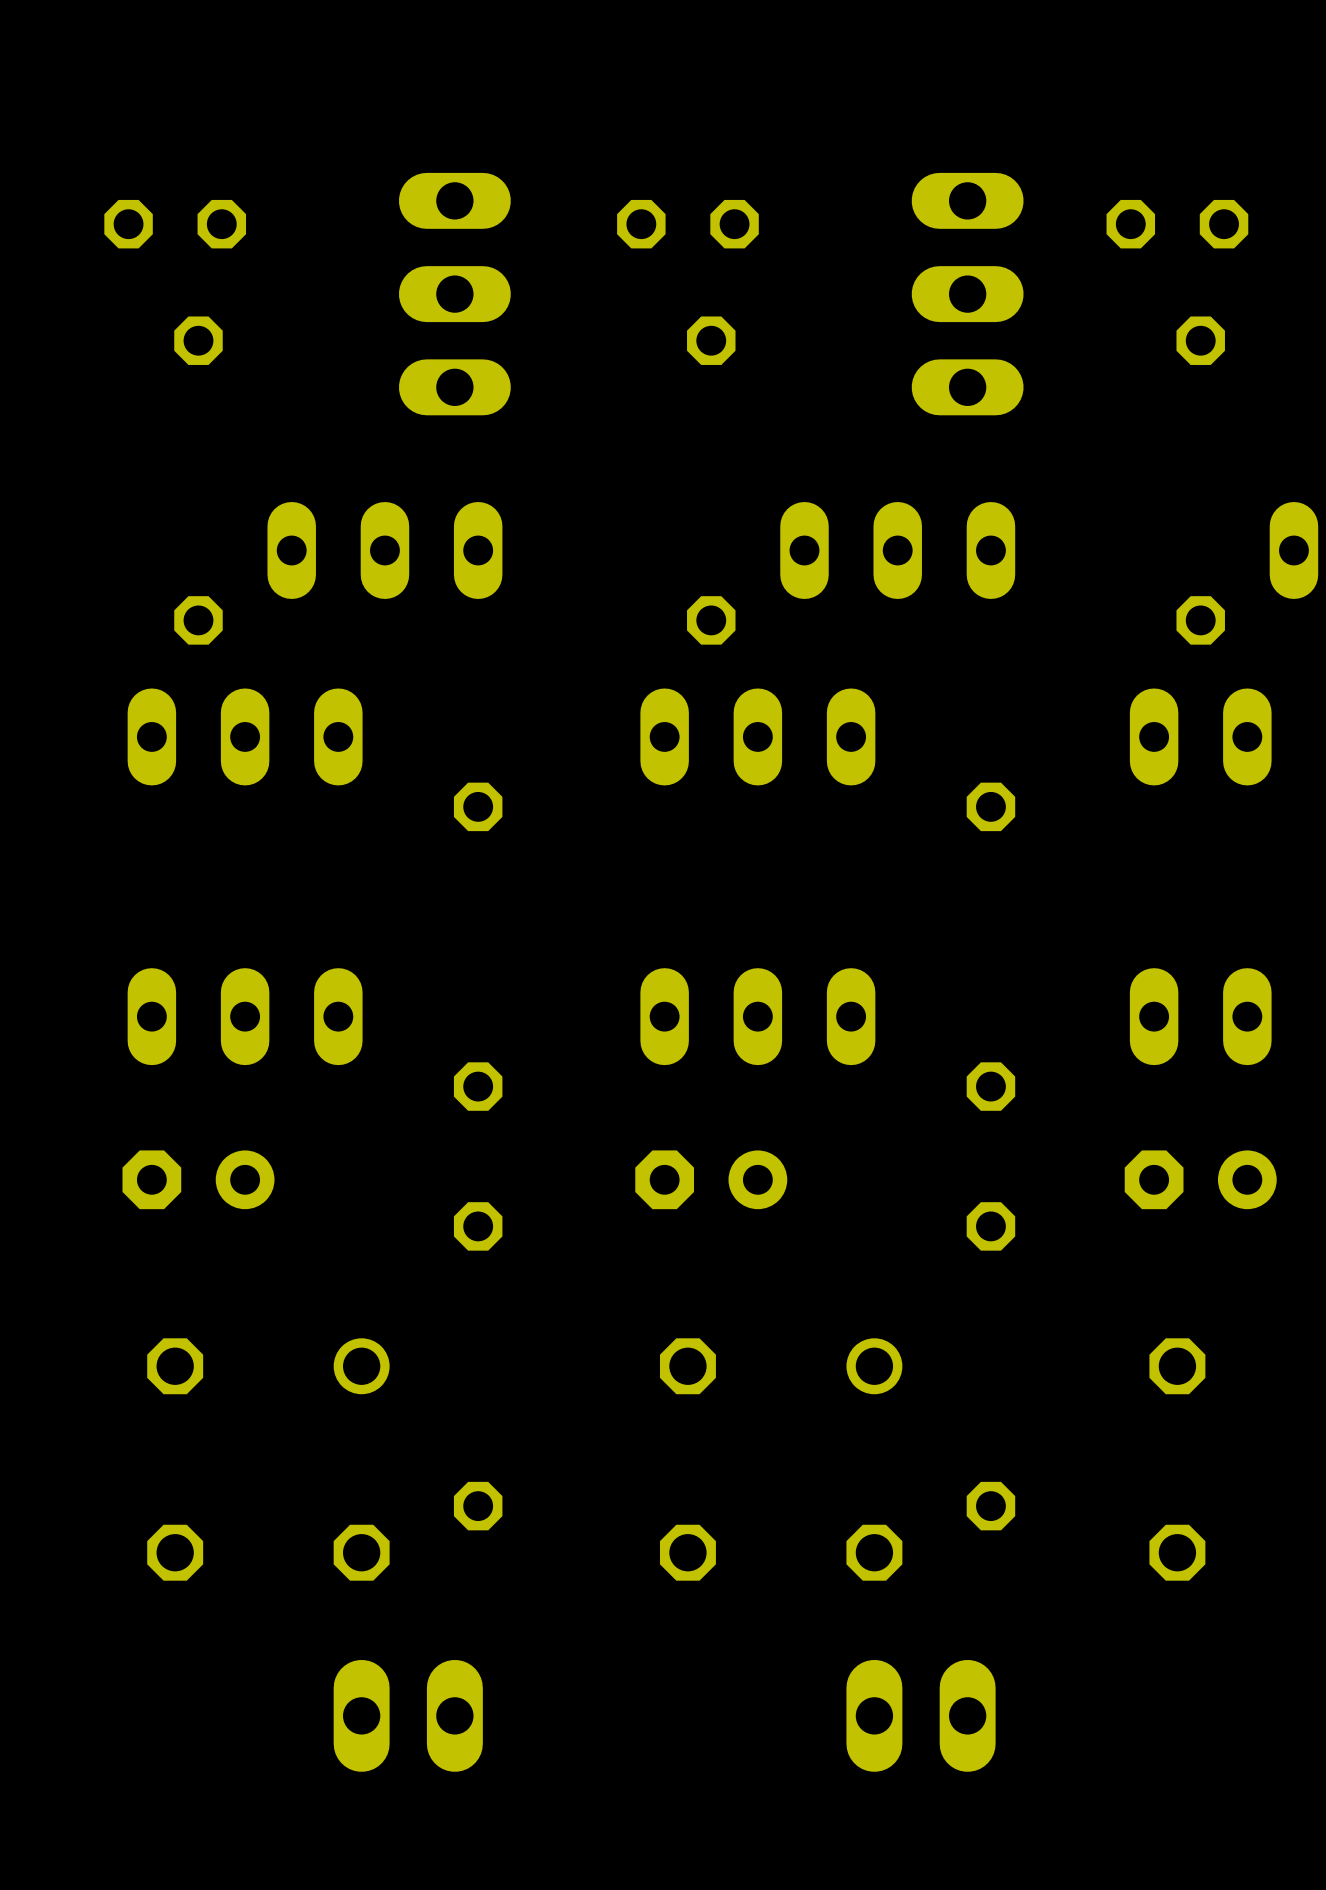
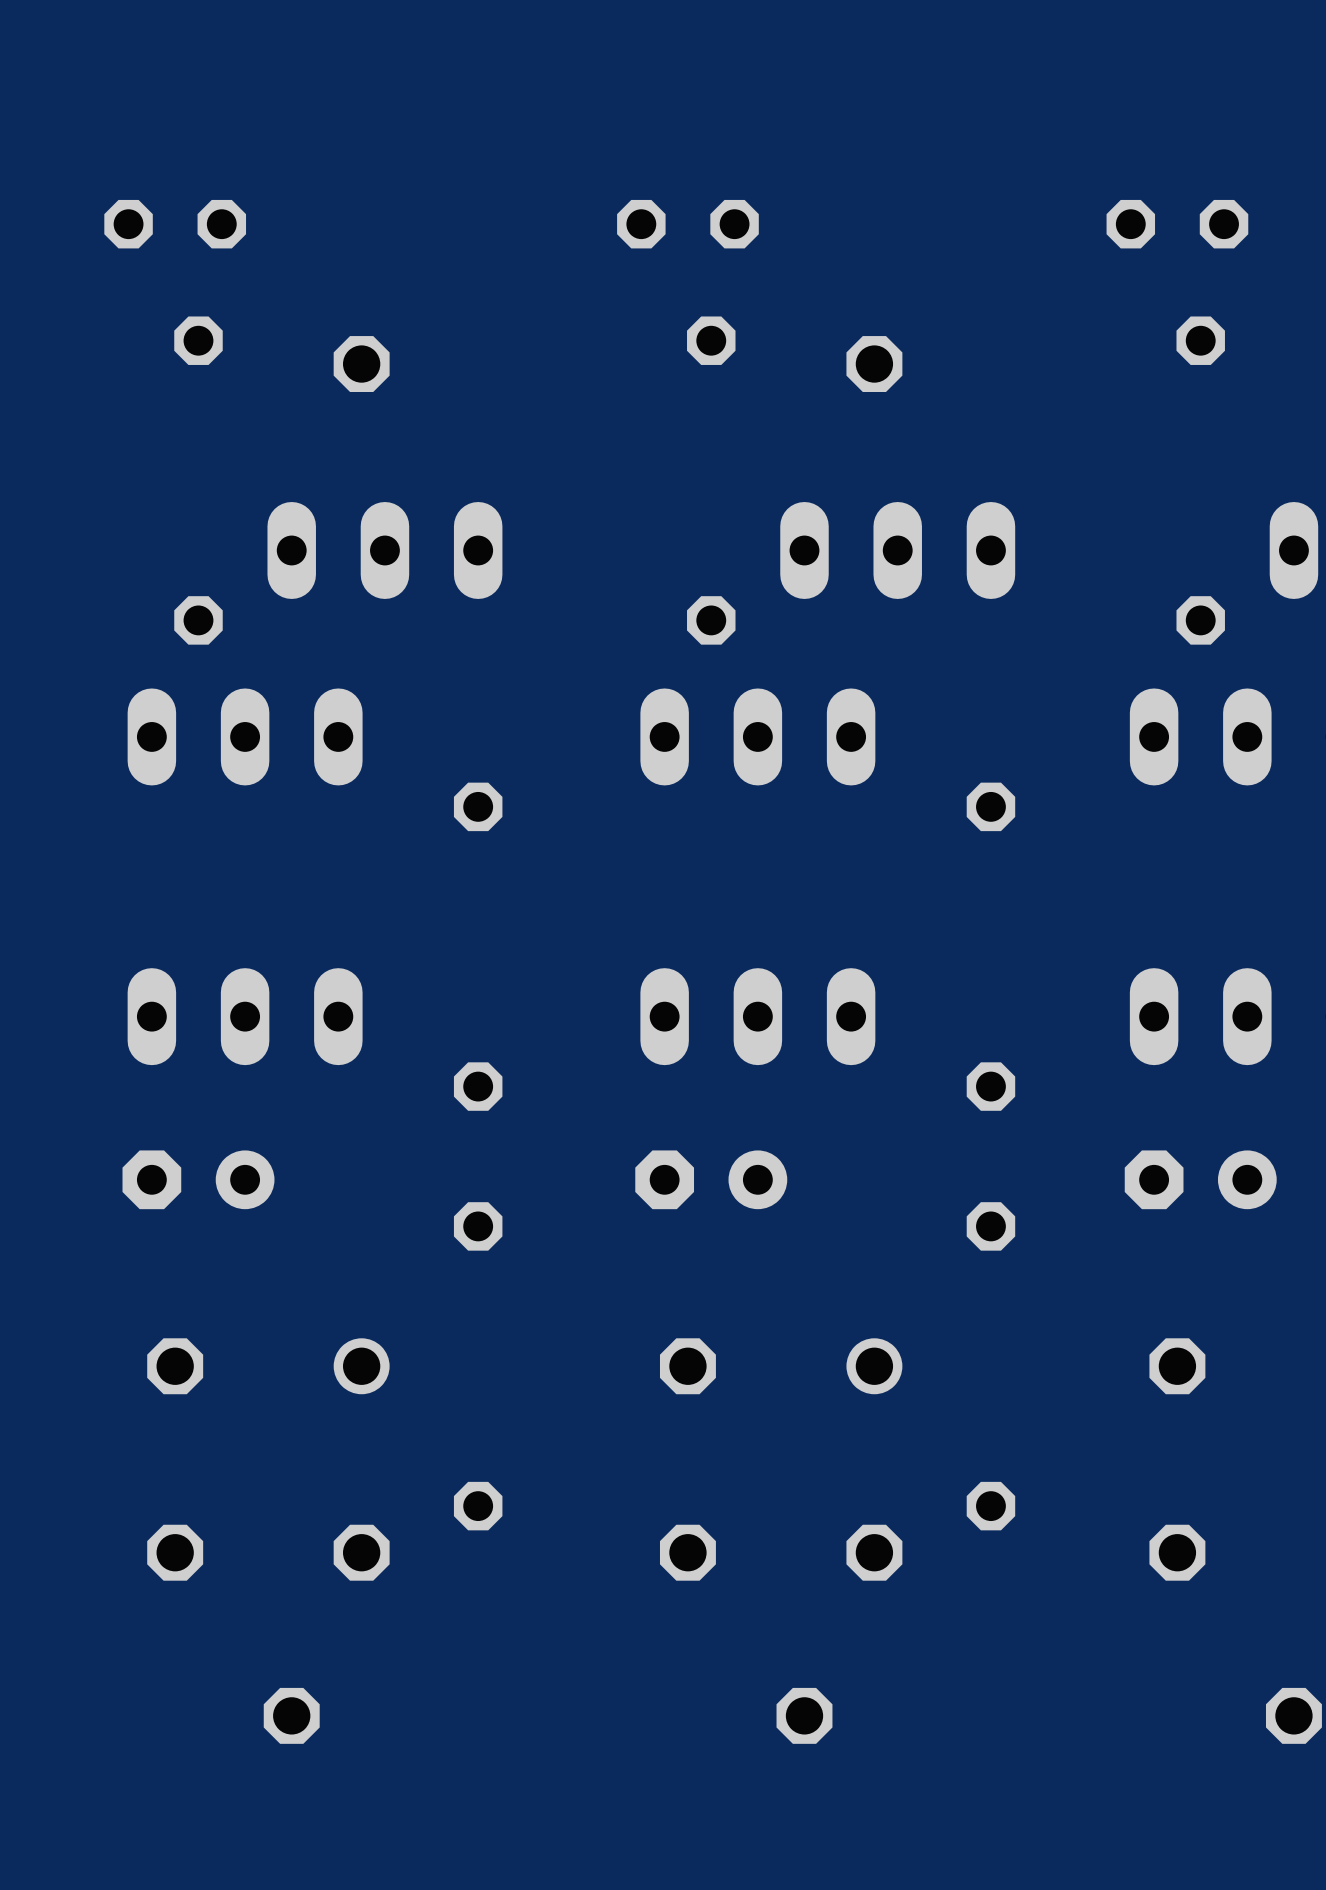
part: (454, 294) -> none
part: (967, 294) -> none
part: none -> (361, 364)
part: none -> (874, 364)
part: none -> (291, 1715)
part: (408, 1715) -> none
part: none -> (804, 1715)
part: (921, 1715) -> none
part: none -> (1293, 1715)

